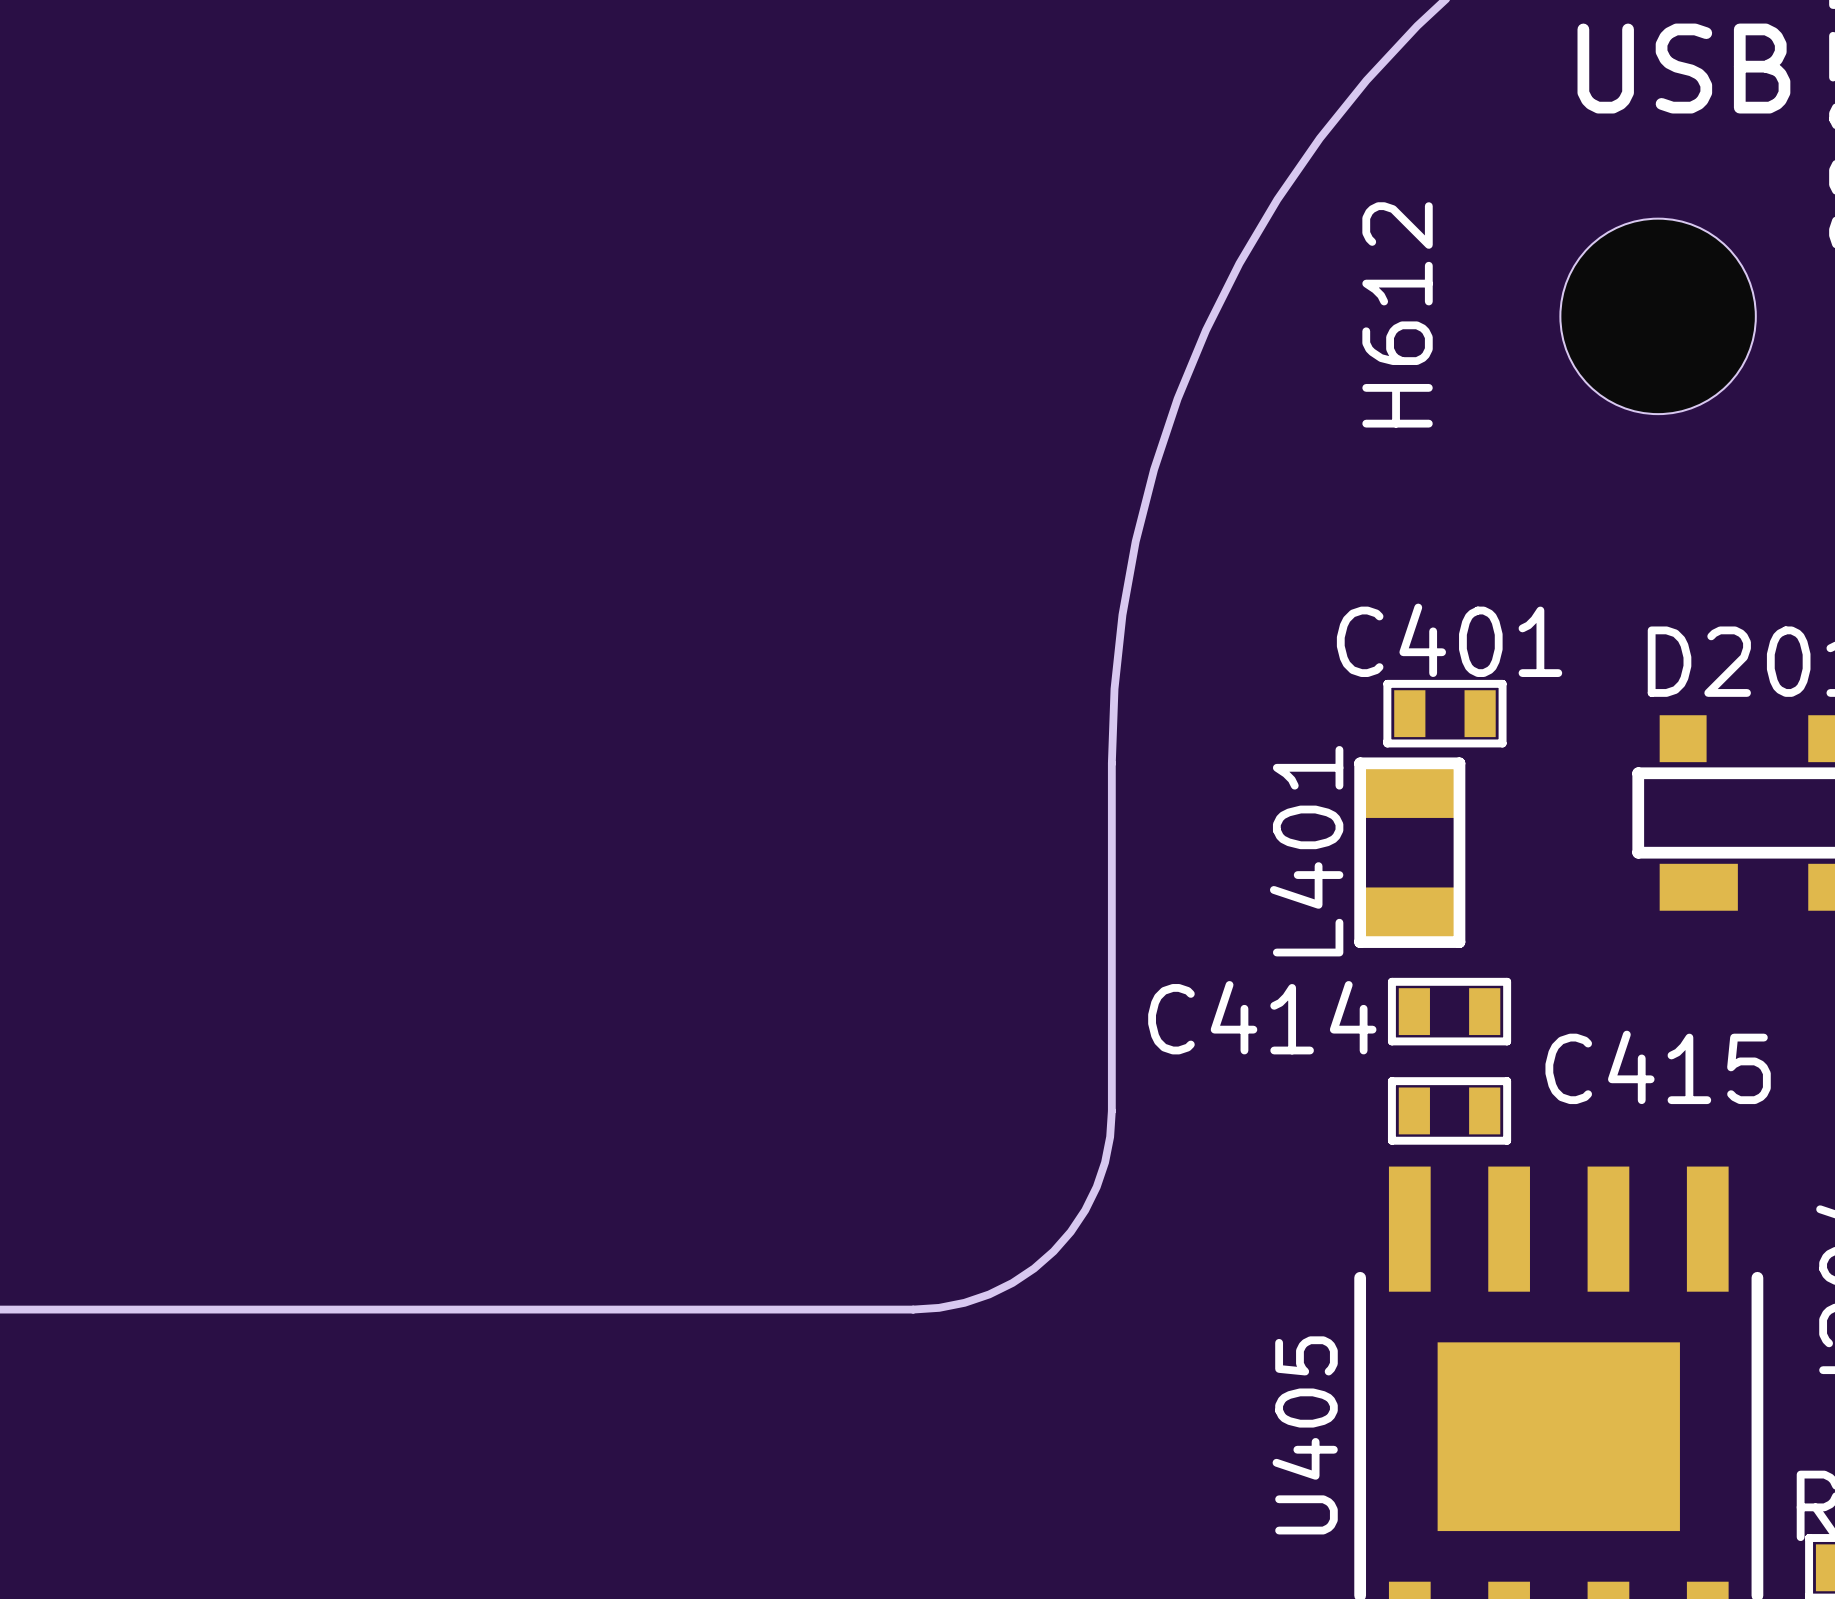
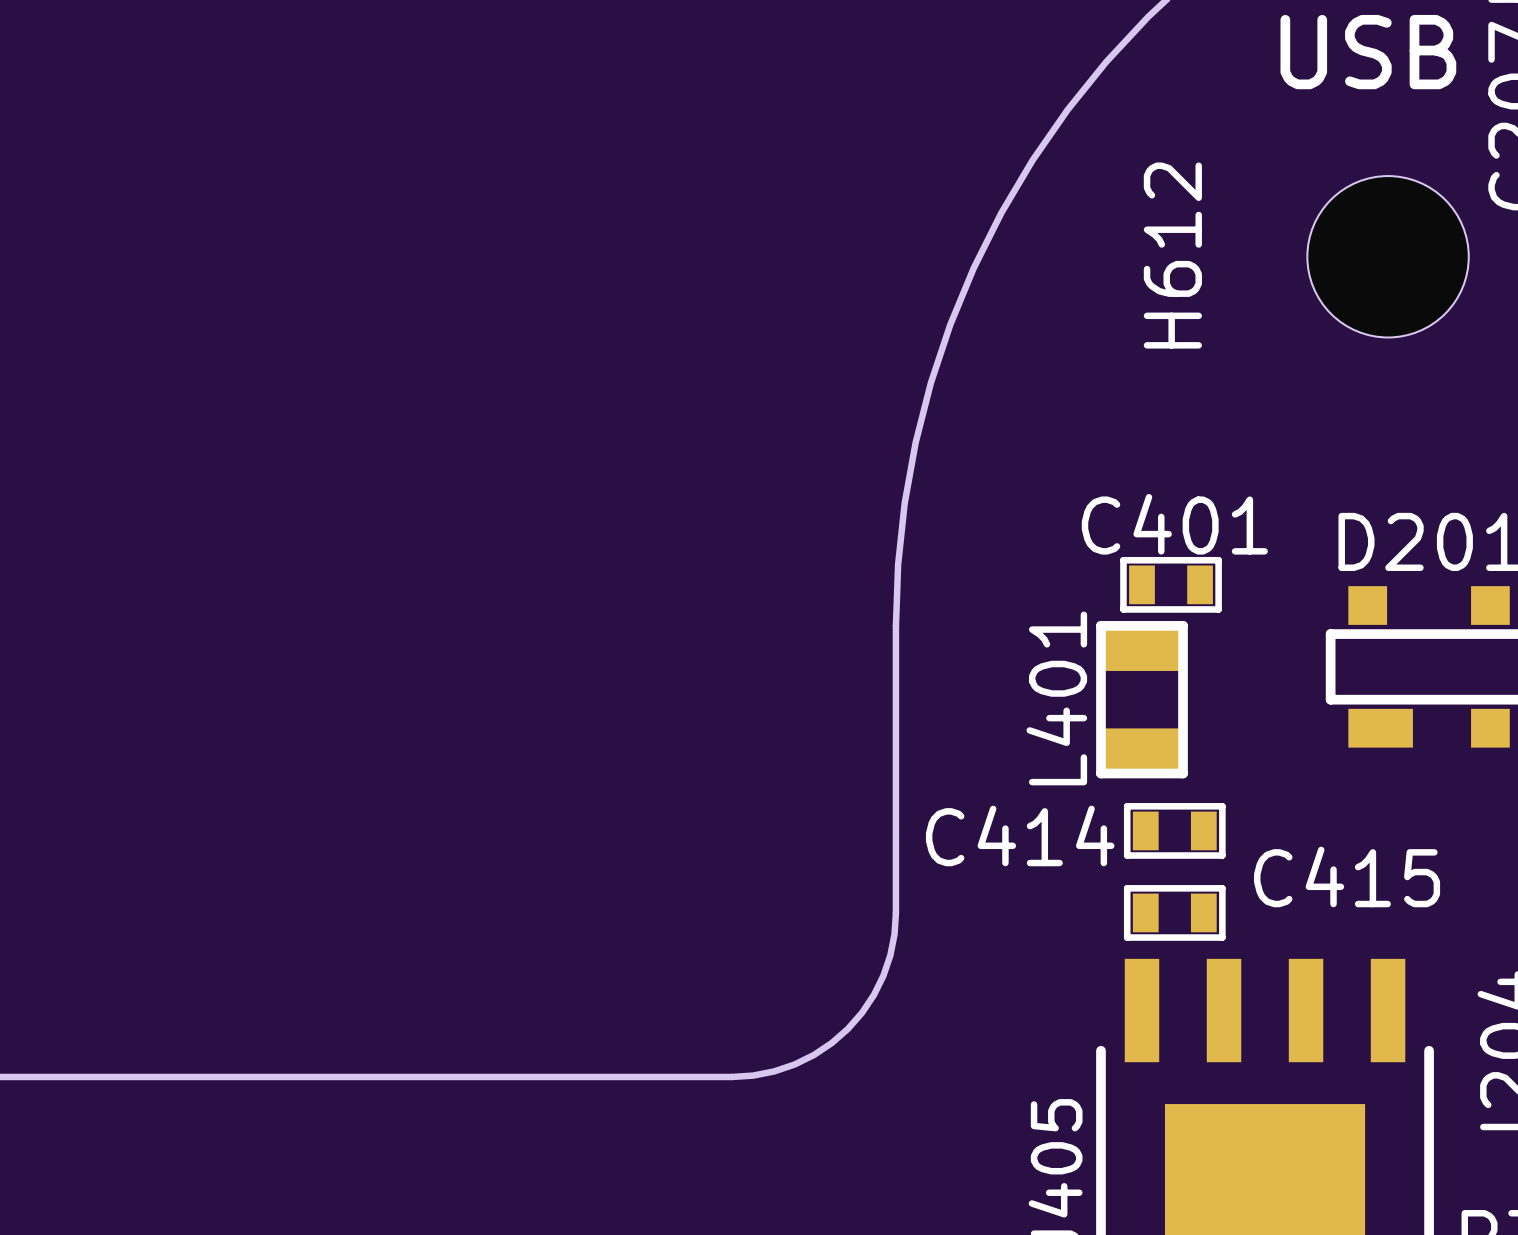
H612 position: (1658, 316) -> (1388, 256)

